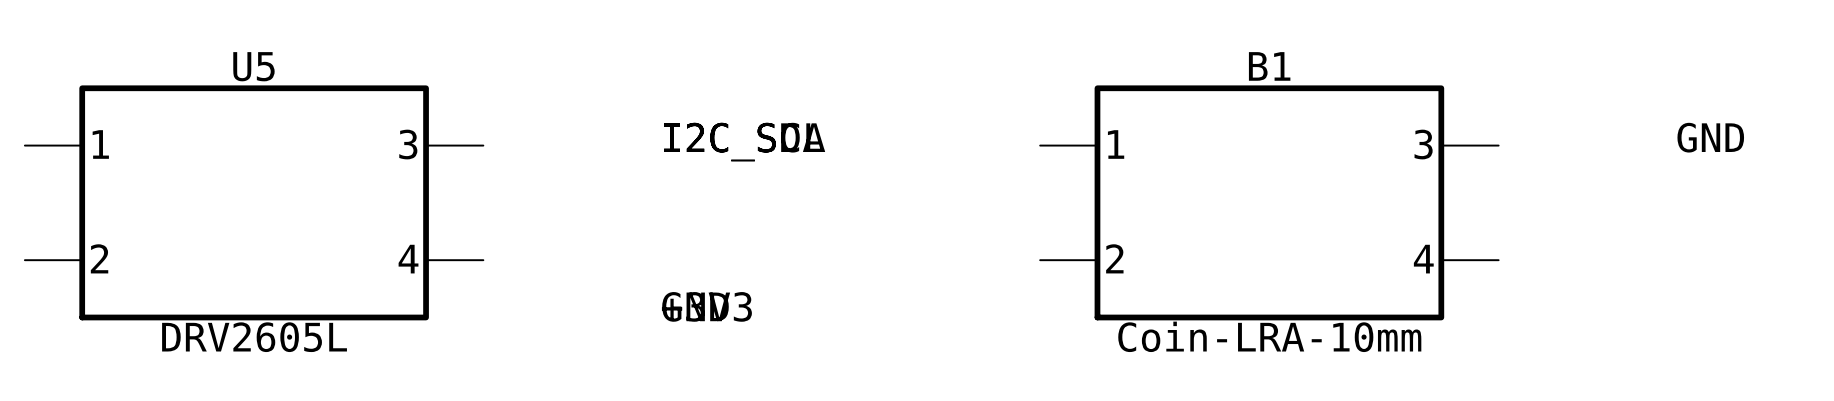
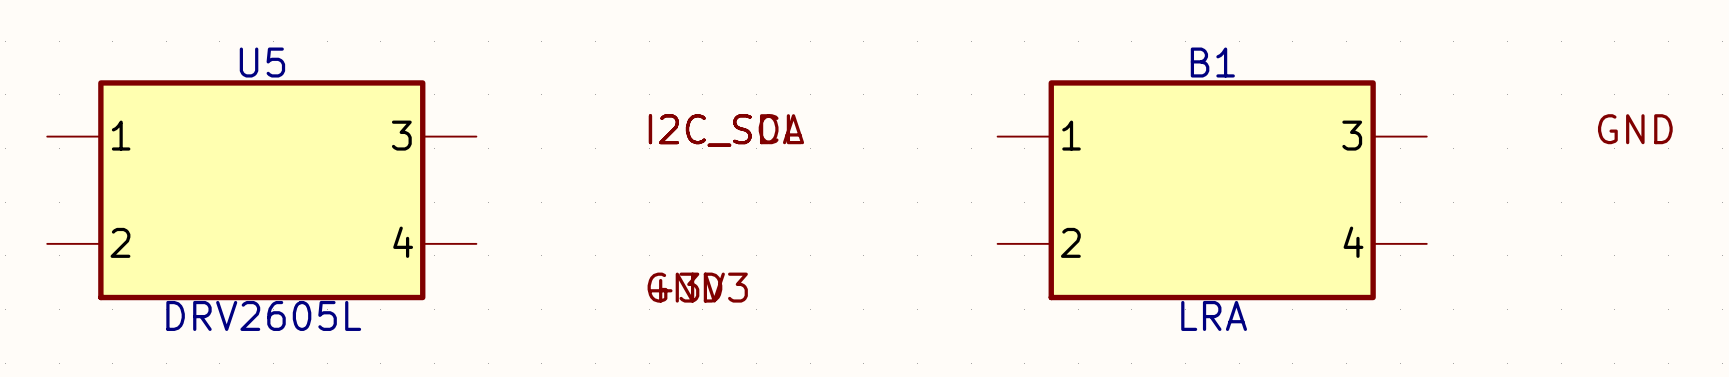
B1 value: Coin-LRA-10mm (1269, 336) -> LRA (1214, 315)

